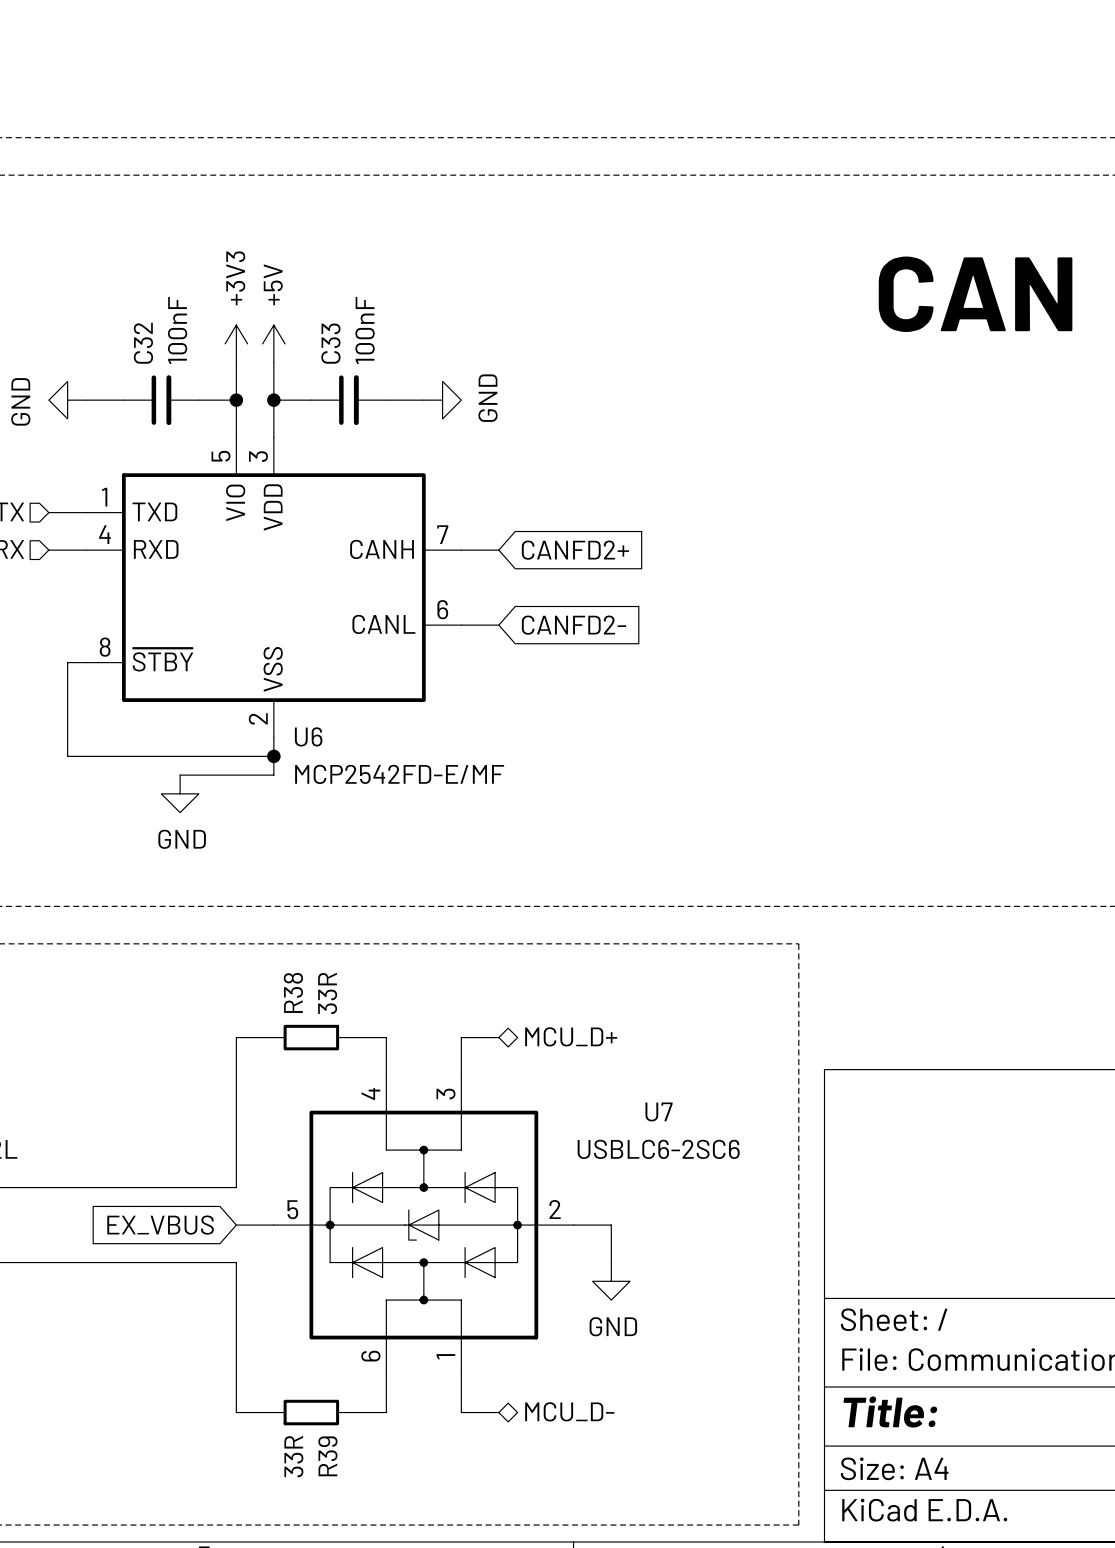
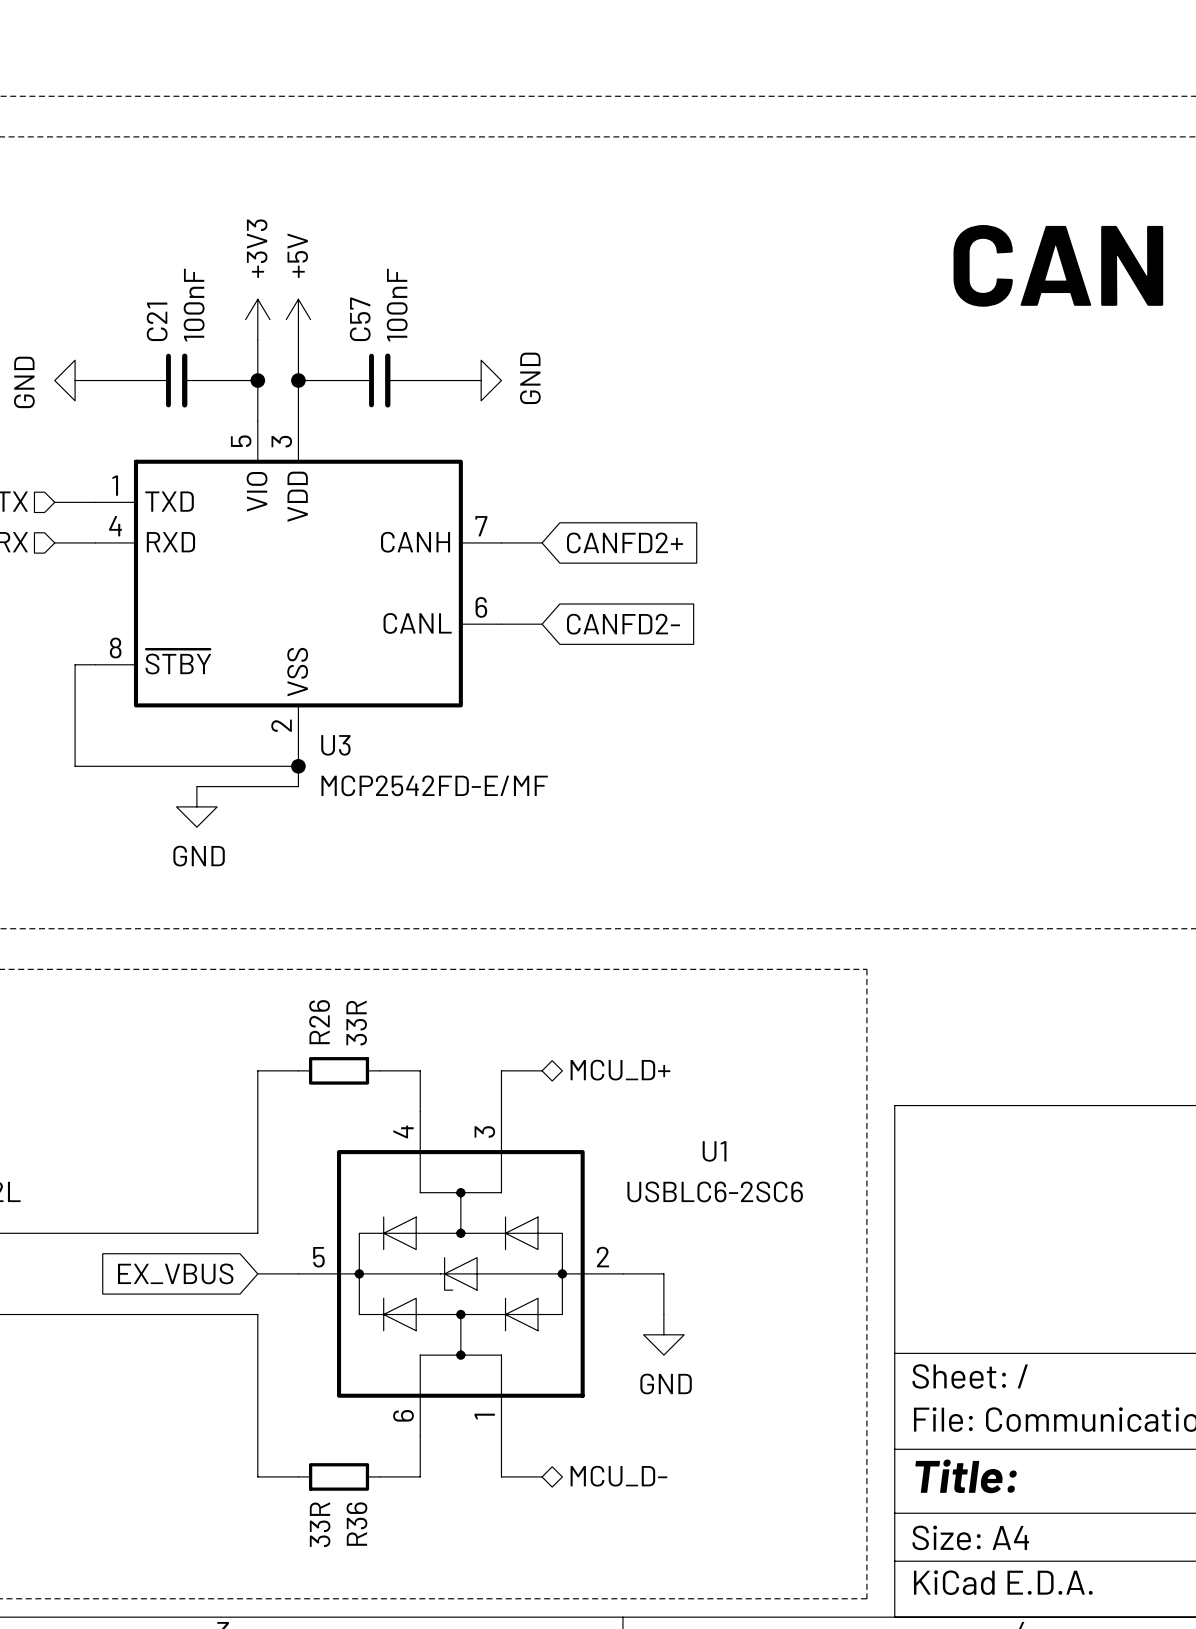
C32 name: C32 (143, 343) -> C21 (157, 321)
C33 name: C33 (330, 343) -> C57 (360, 319)
U6 name: U6 (308, 736) -> U3 (335, 745)
R38 name: R38 (293, 992) -> R26 (319, 1022)
U7 name: U7 (659, 1111) -> U1 (714, 1151)
R39 name: R39 (327, 1456) -> R36 (356, 1524)

